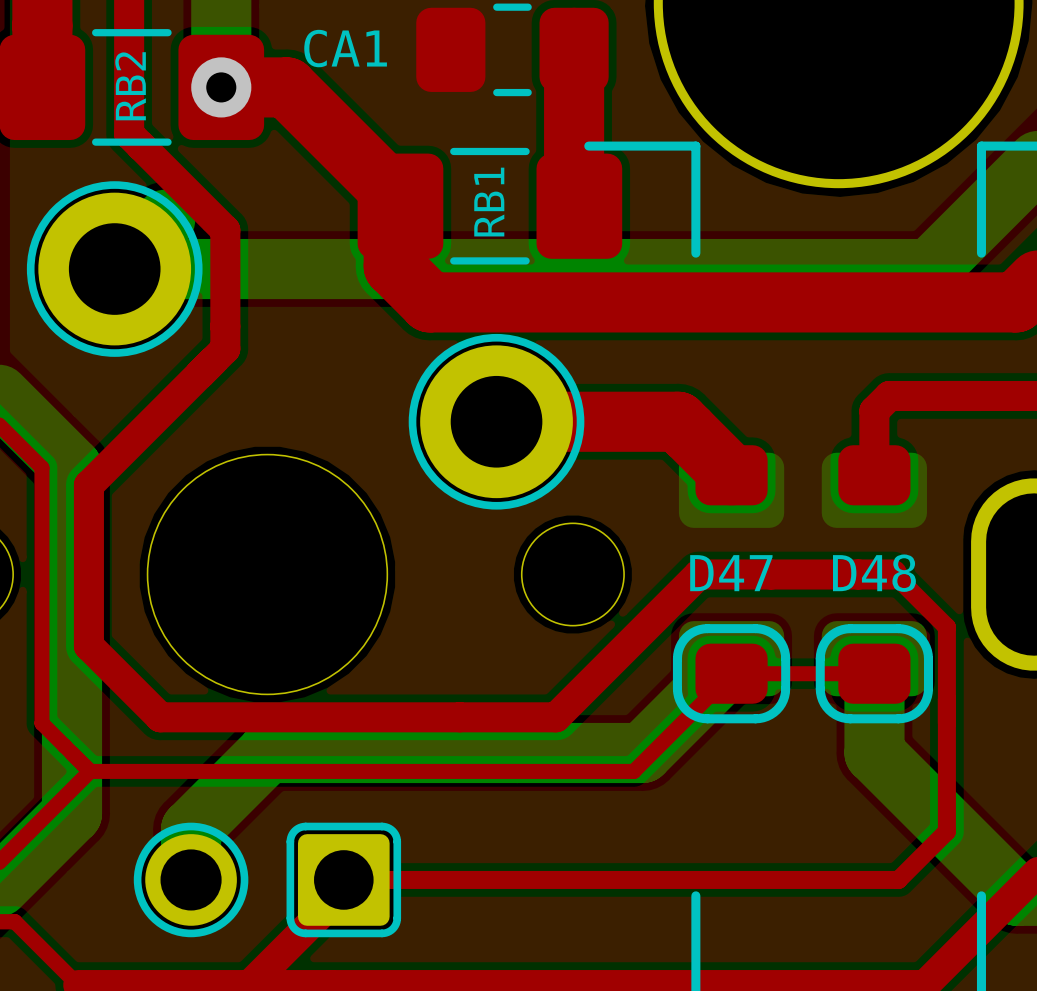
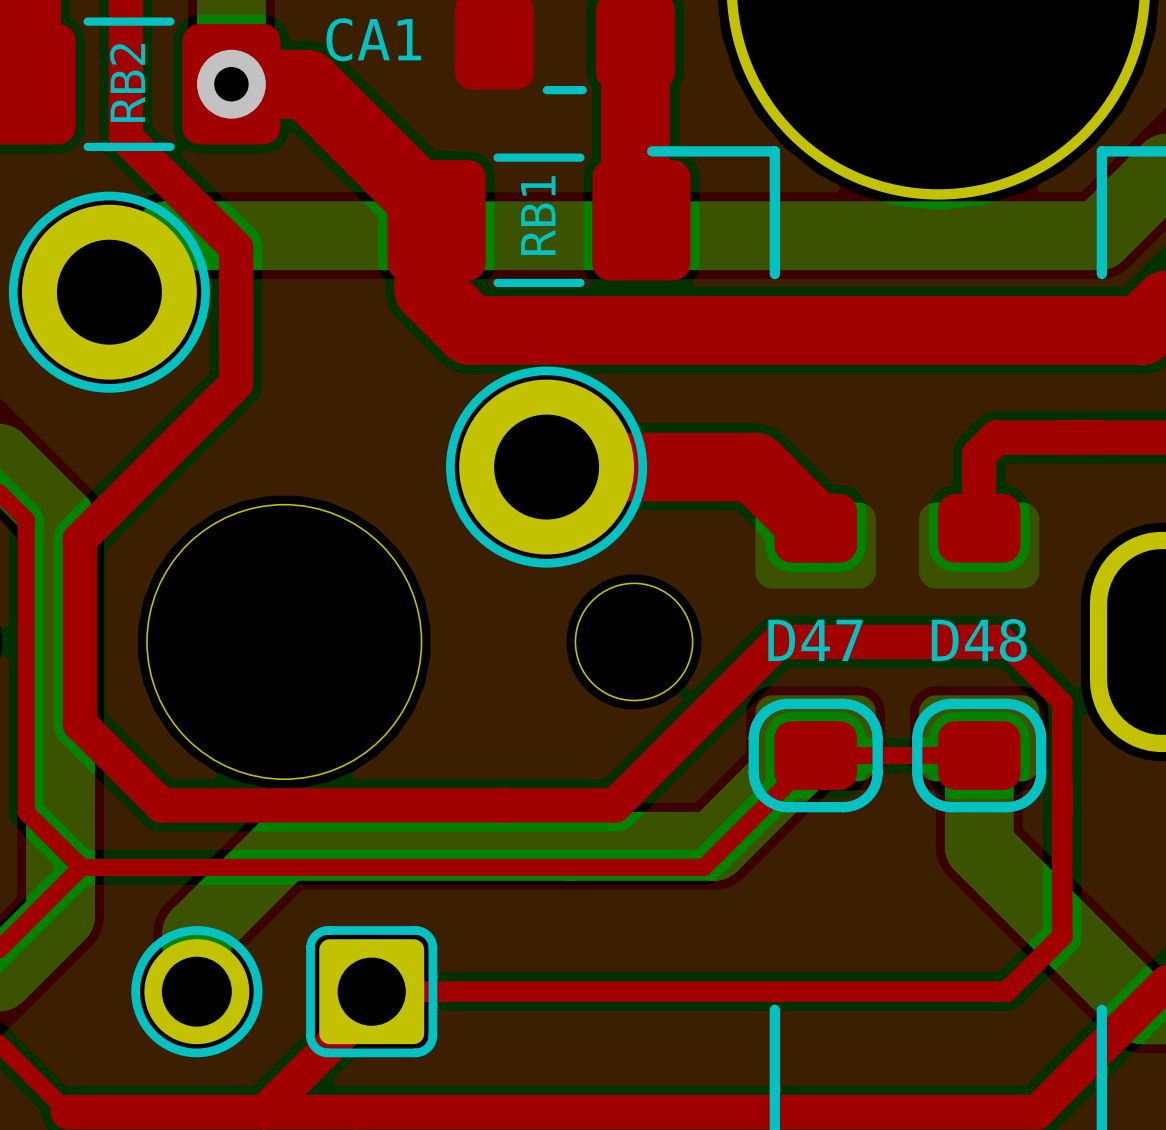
bottom track: (979, 219) (929, 269) (114, 269) -> (1099, 235) (167, 235)

